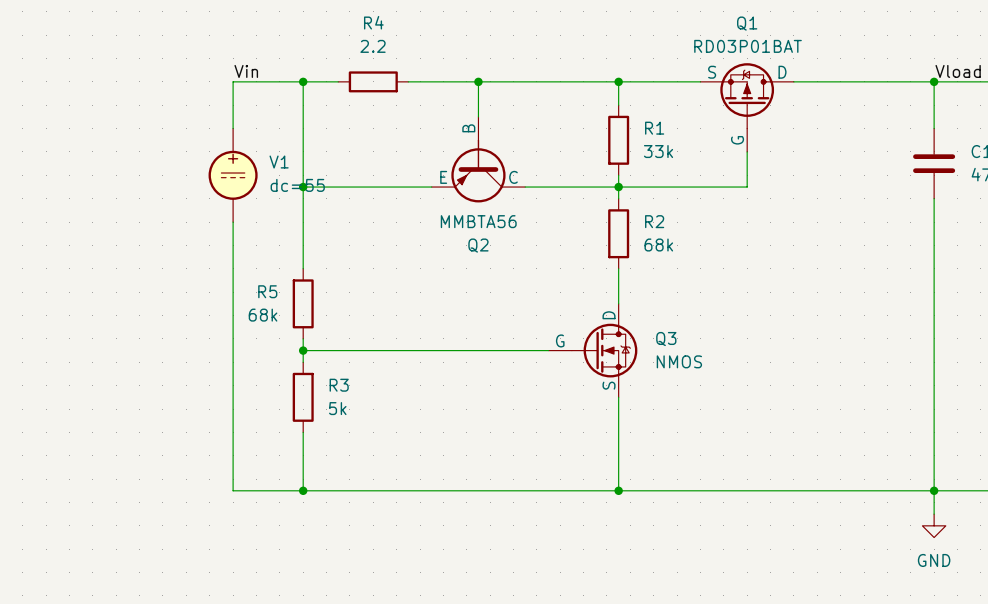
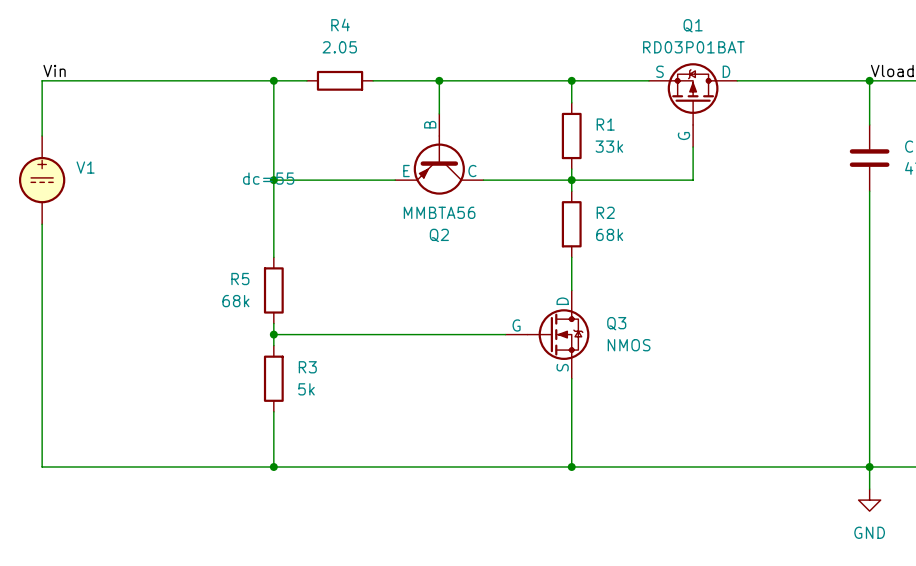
R4 value: 2.2 (373, 46) -> 2.05 (339, 47)
label position: Vin (246, 71) -> Vin (54, 70)
wire: (233, 81) (233, 128) -> (207, 80) (42, 80) (42, 135)
V1 position: (233, 175) -> (42, 180)
wire: (233, 222) (233, 490) -> (42, 224) (42, 466) (207, 466)

